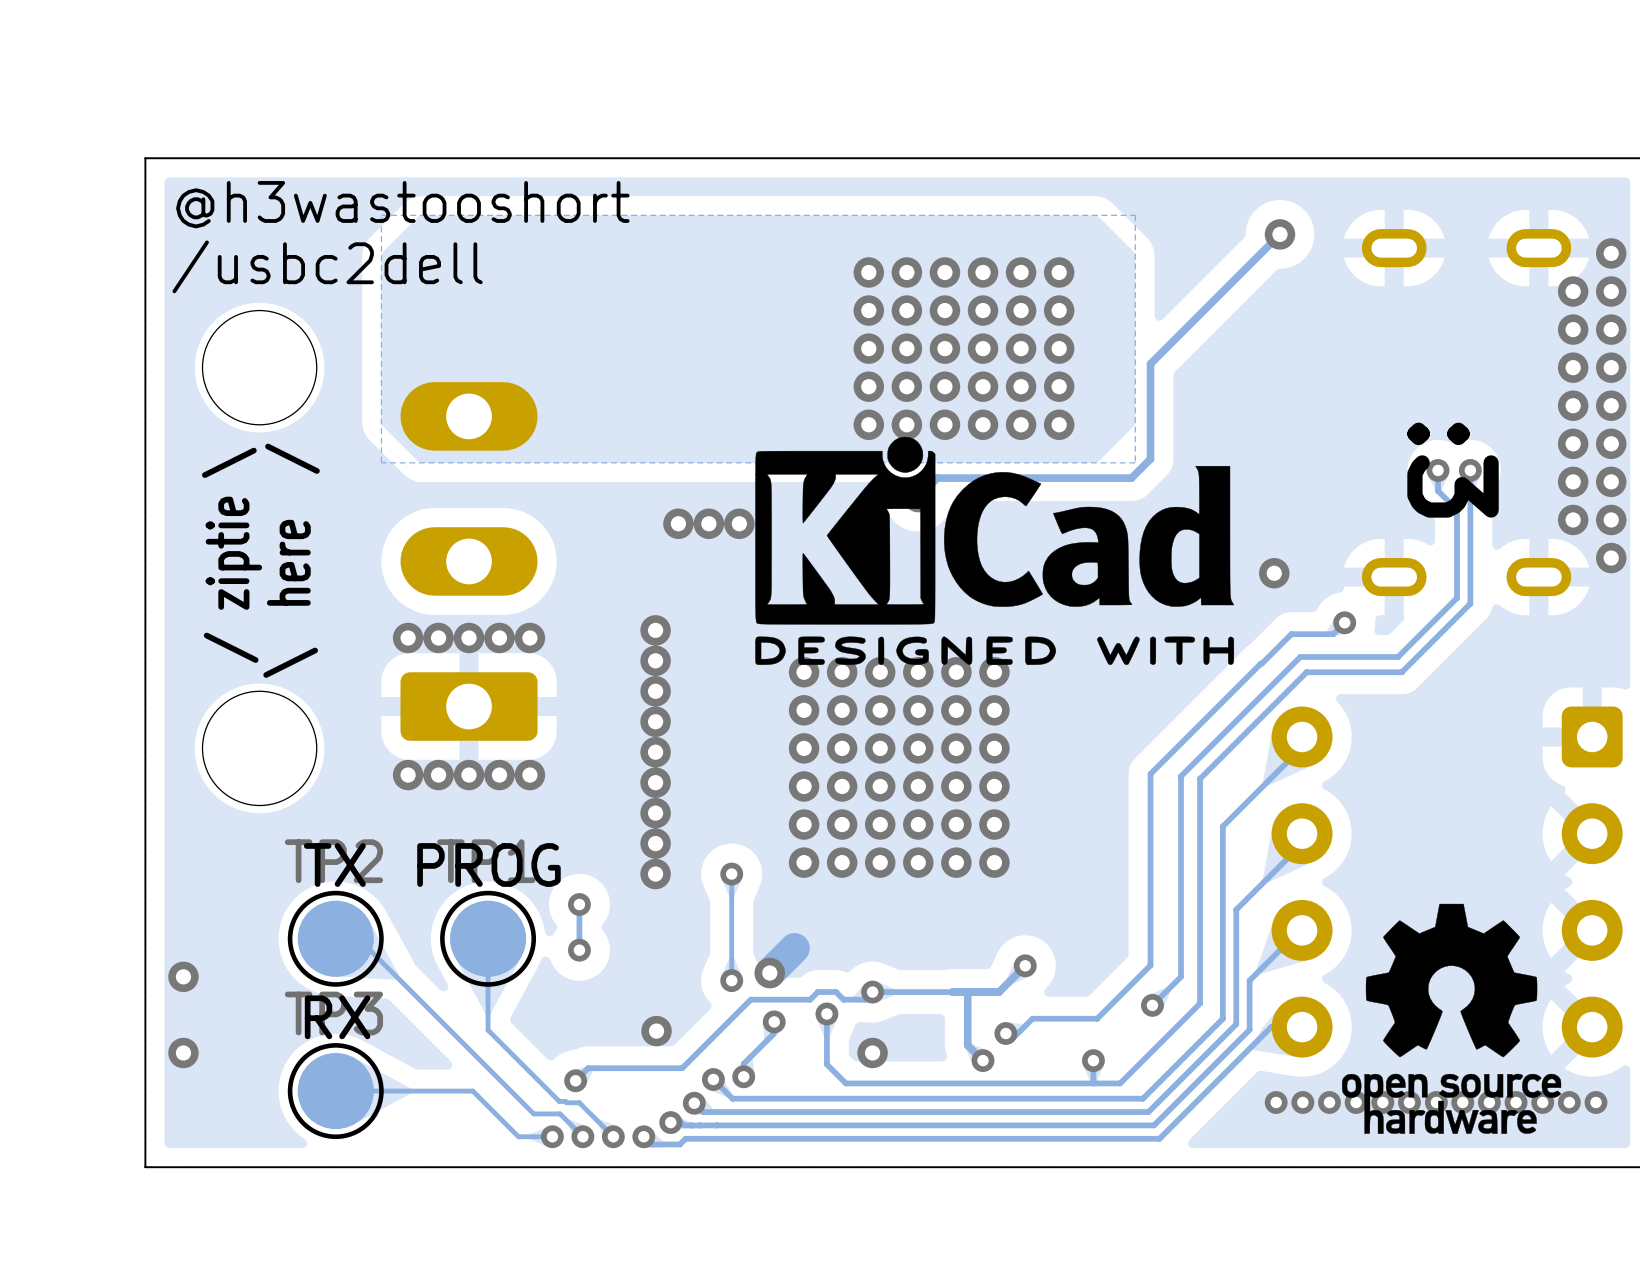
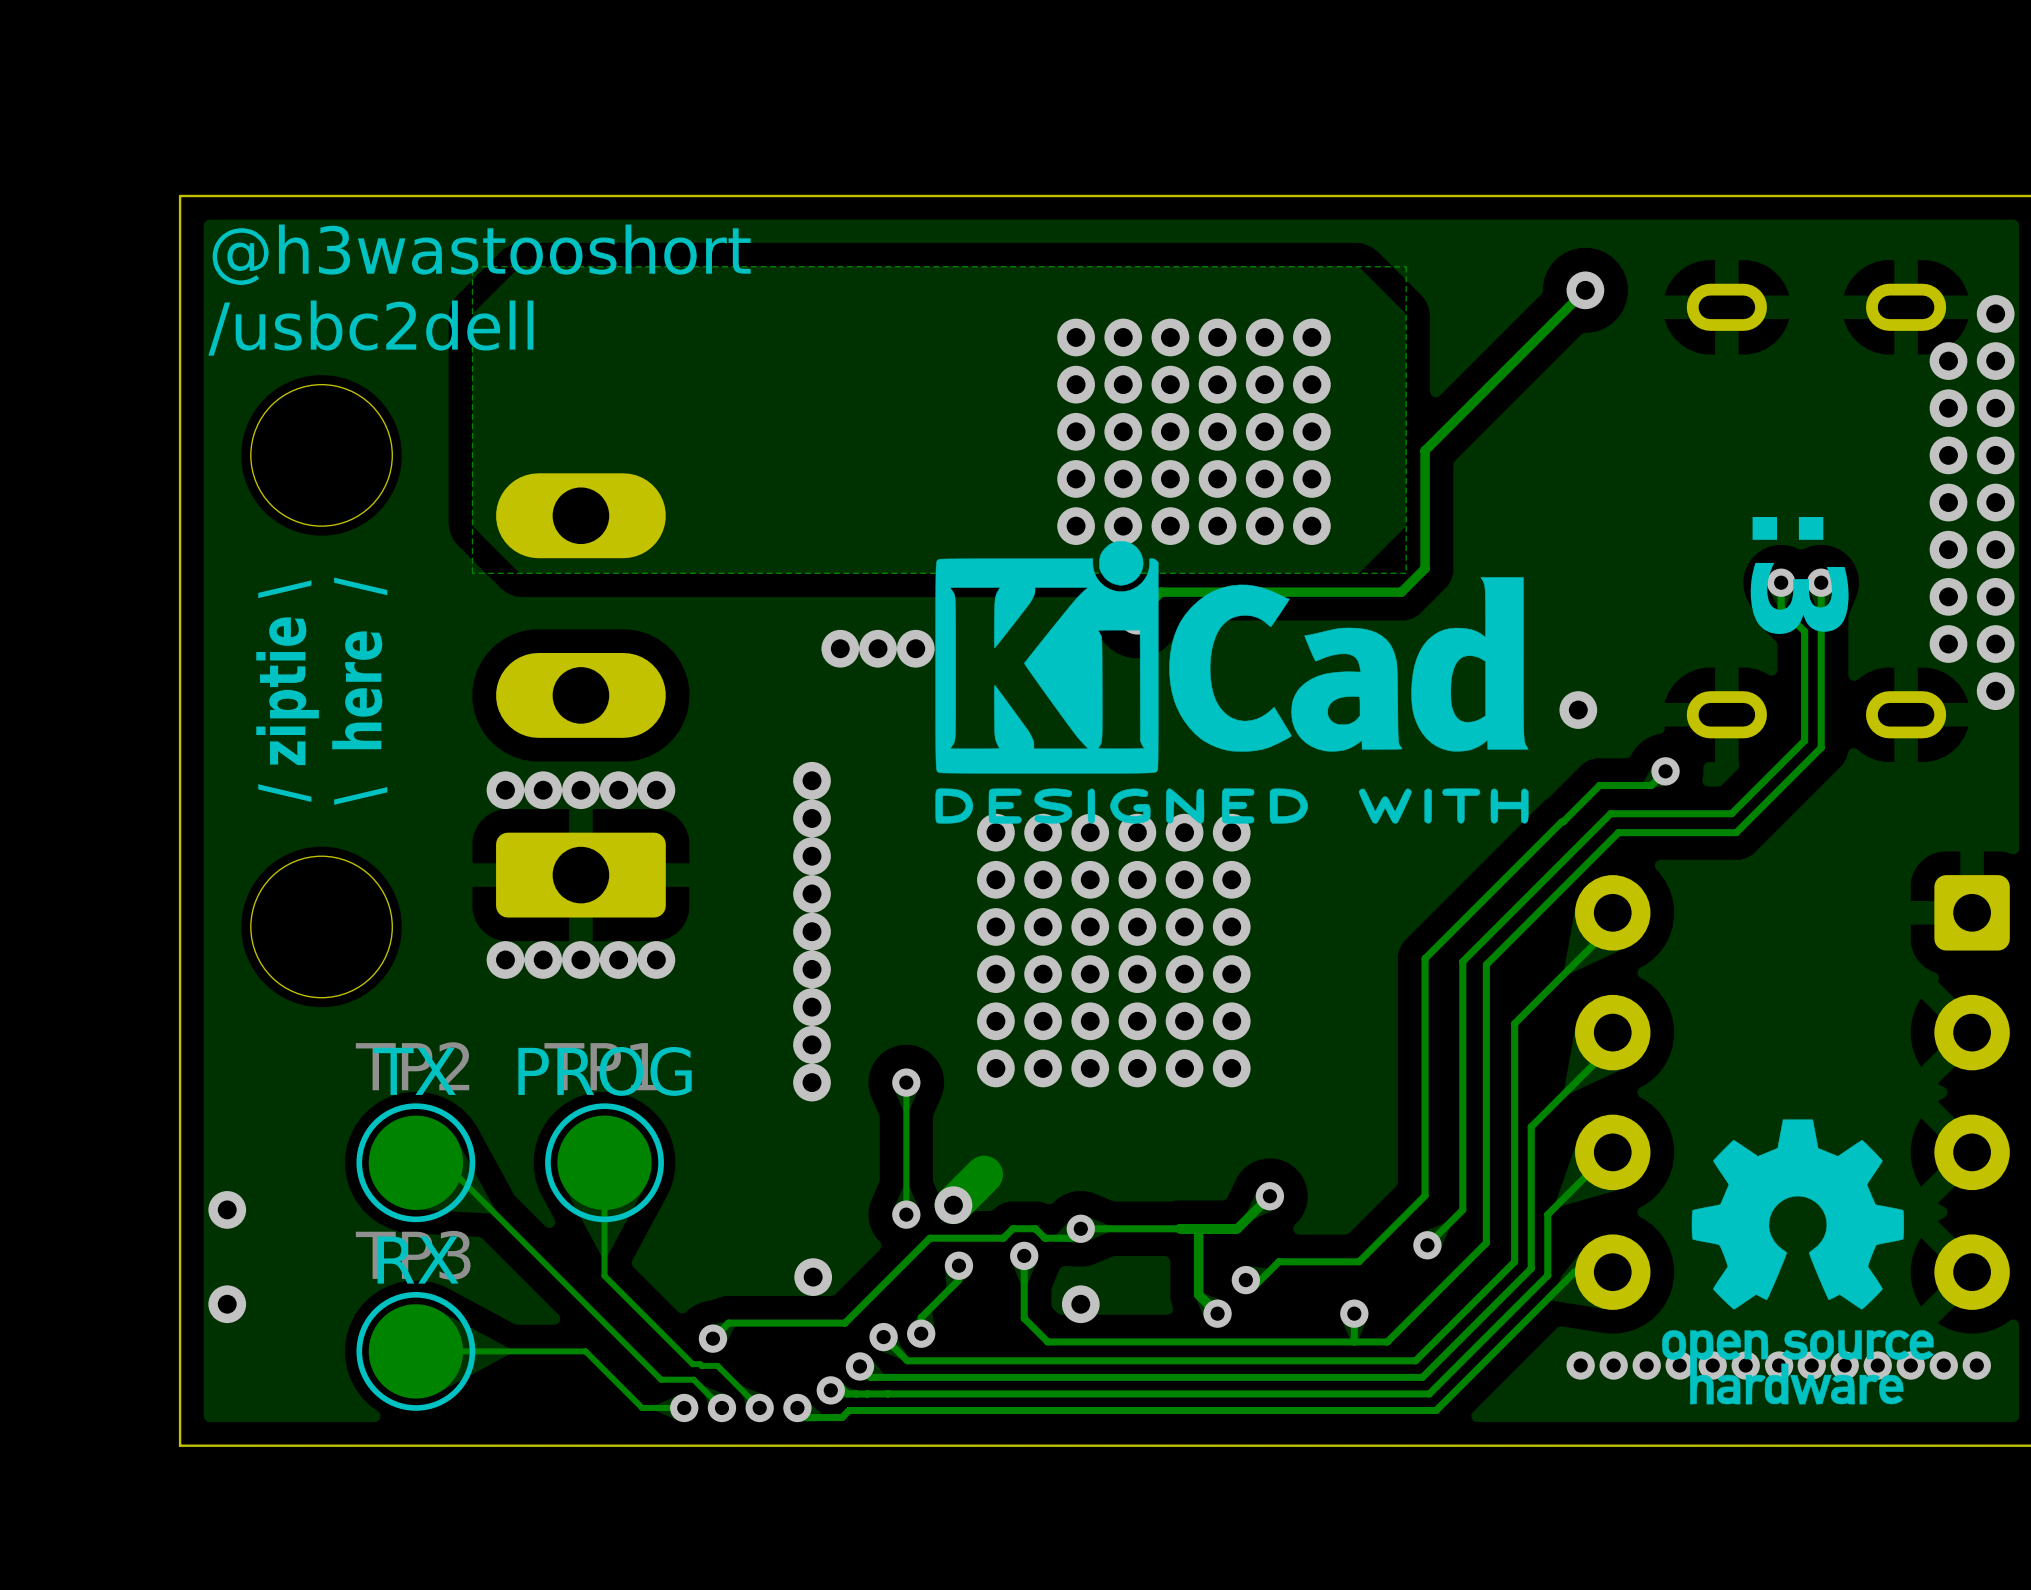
track: (579, 904) (579, 950) -> none
via: (579, 904) -> none
via: (579, 950) -> none

